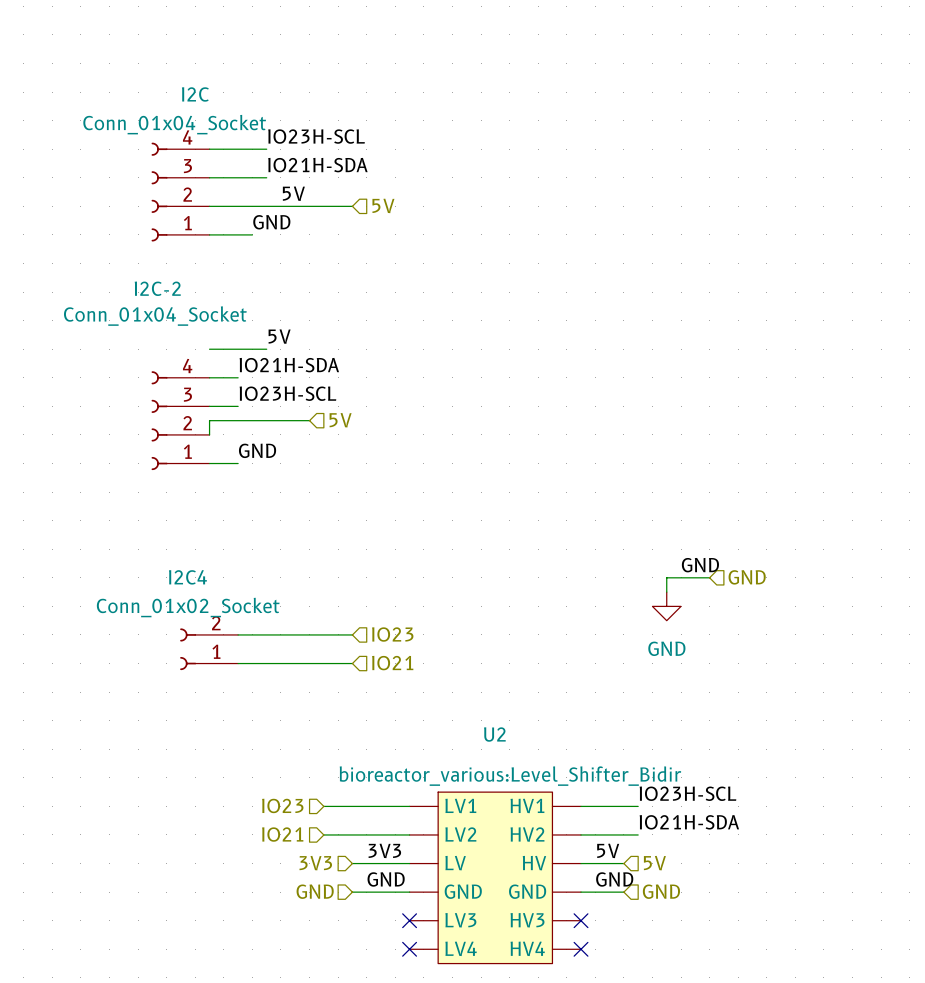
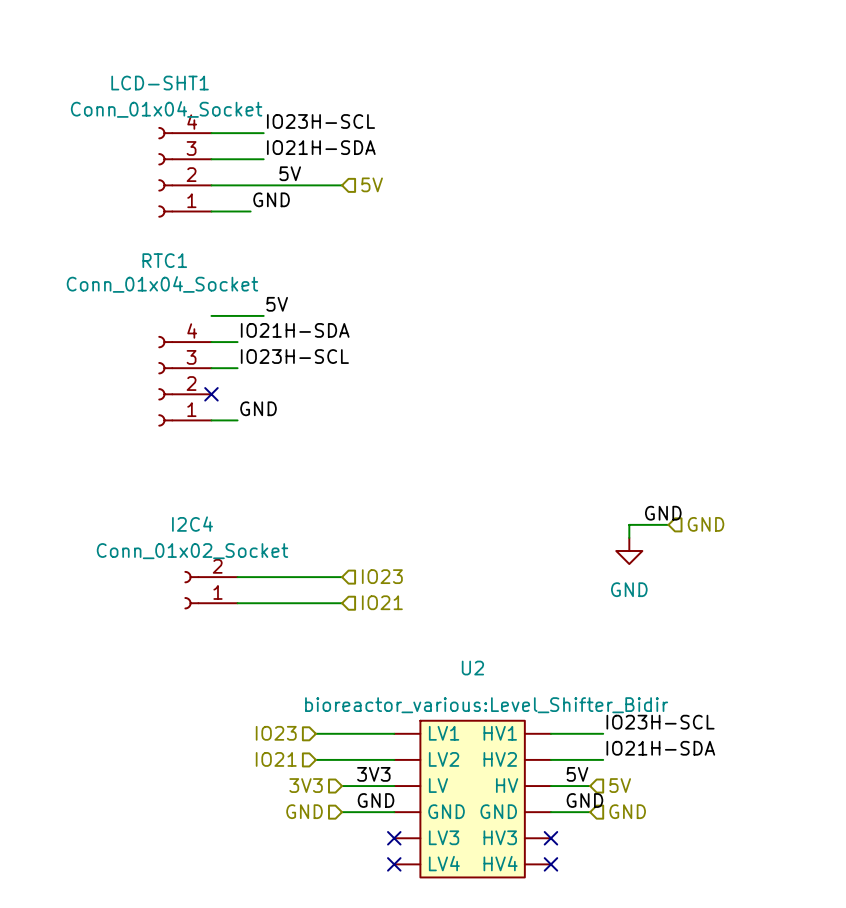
I2C name: I2C (195, 94) -> LCD-SHT1 (160, 83)
I2C-2 name: I2C-2 (157, 288) -> RTC1 (164, 260)
wire: (309, 420) (209, 420) (209, 434) -> none
hierarchical label: 5V (340, 420) -> none
no-connect mark: none -> (211, 394)

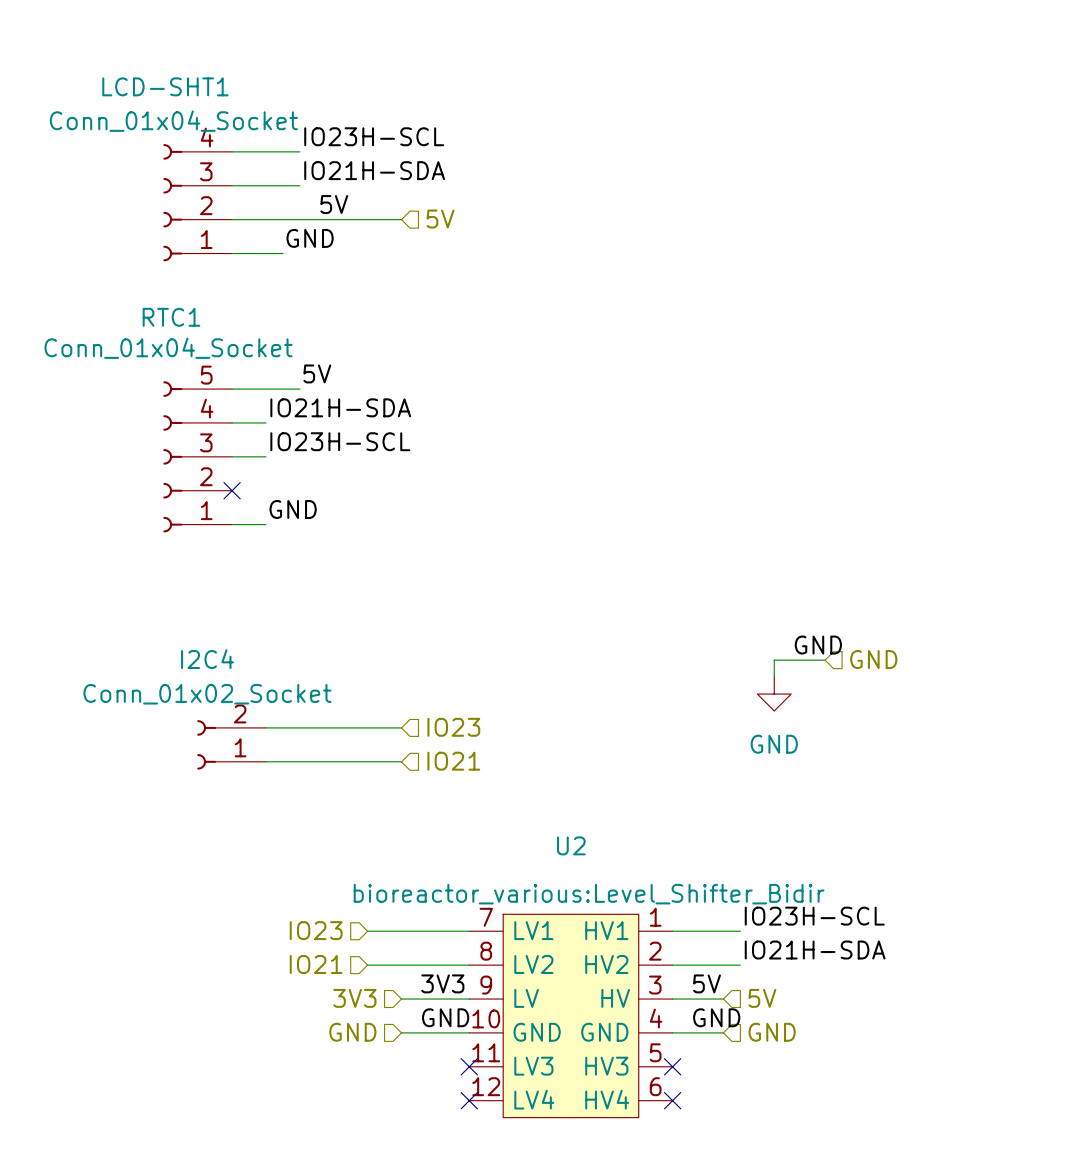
RTC1 symbol: [158, 336, 212, 427] -> [163, 381, 233, 533]
U2 symbol: [394, 720, 551, 878] -> [469, 914, 673, 1118]

